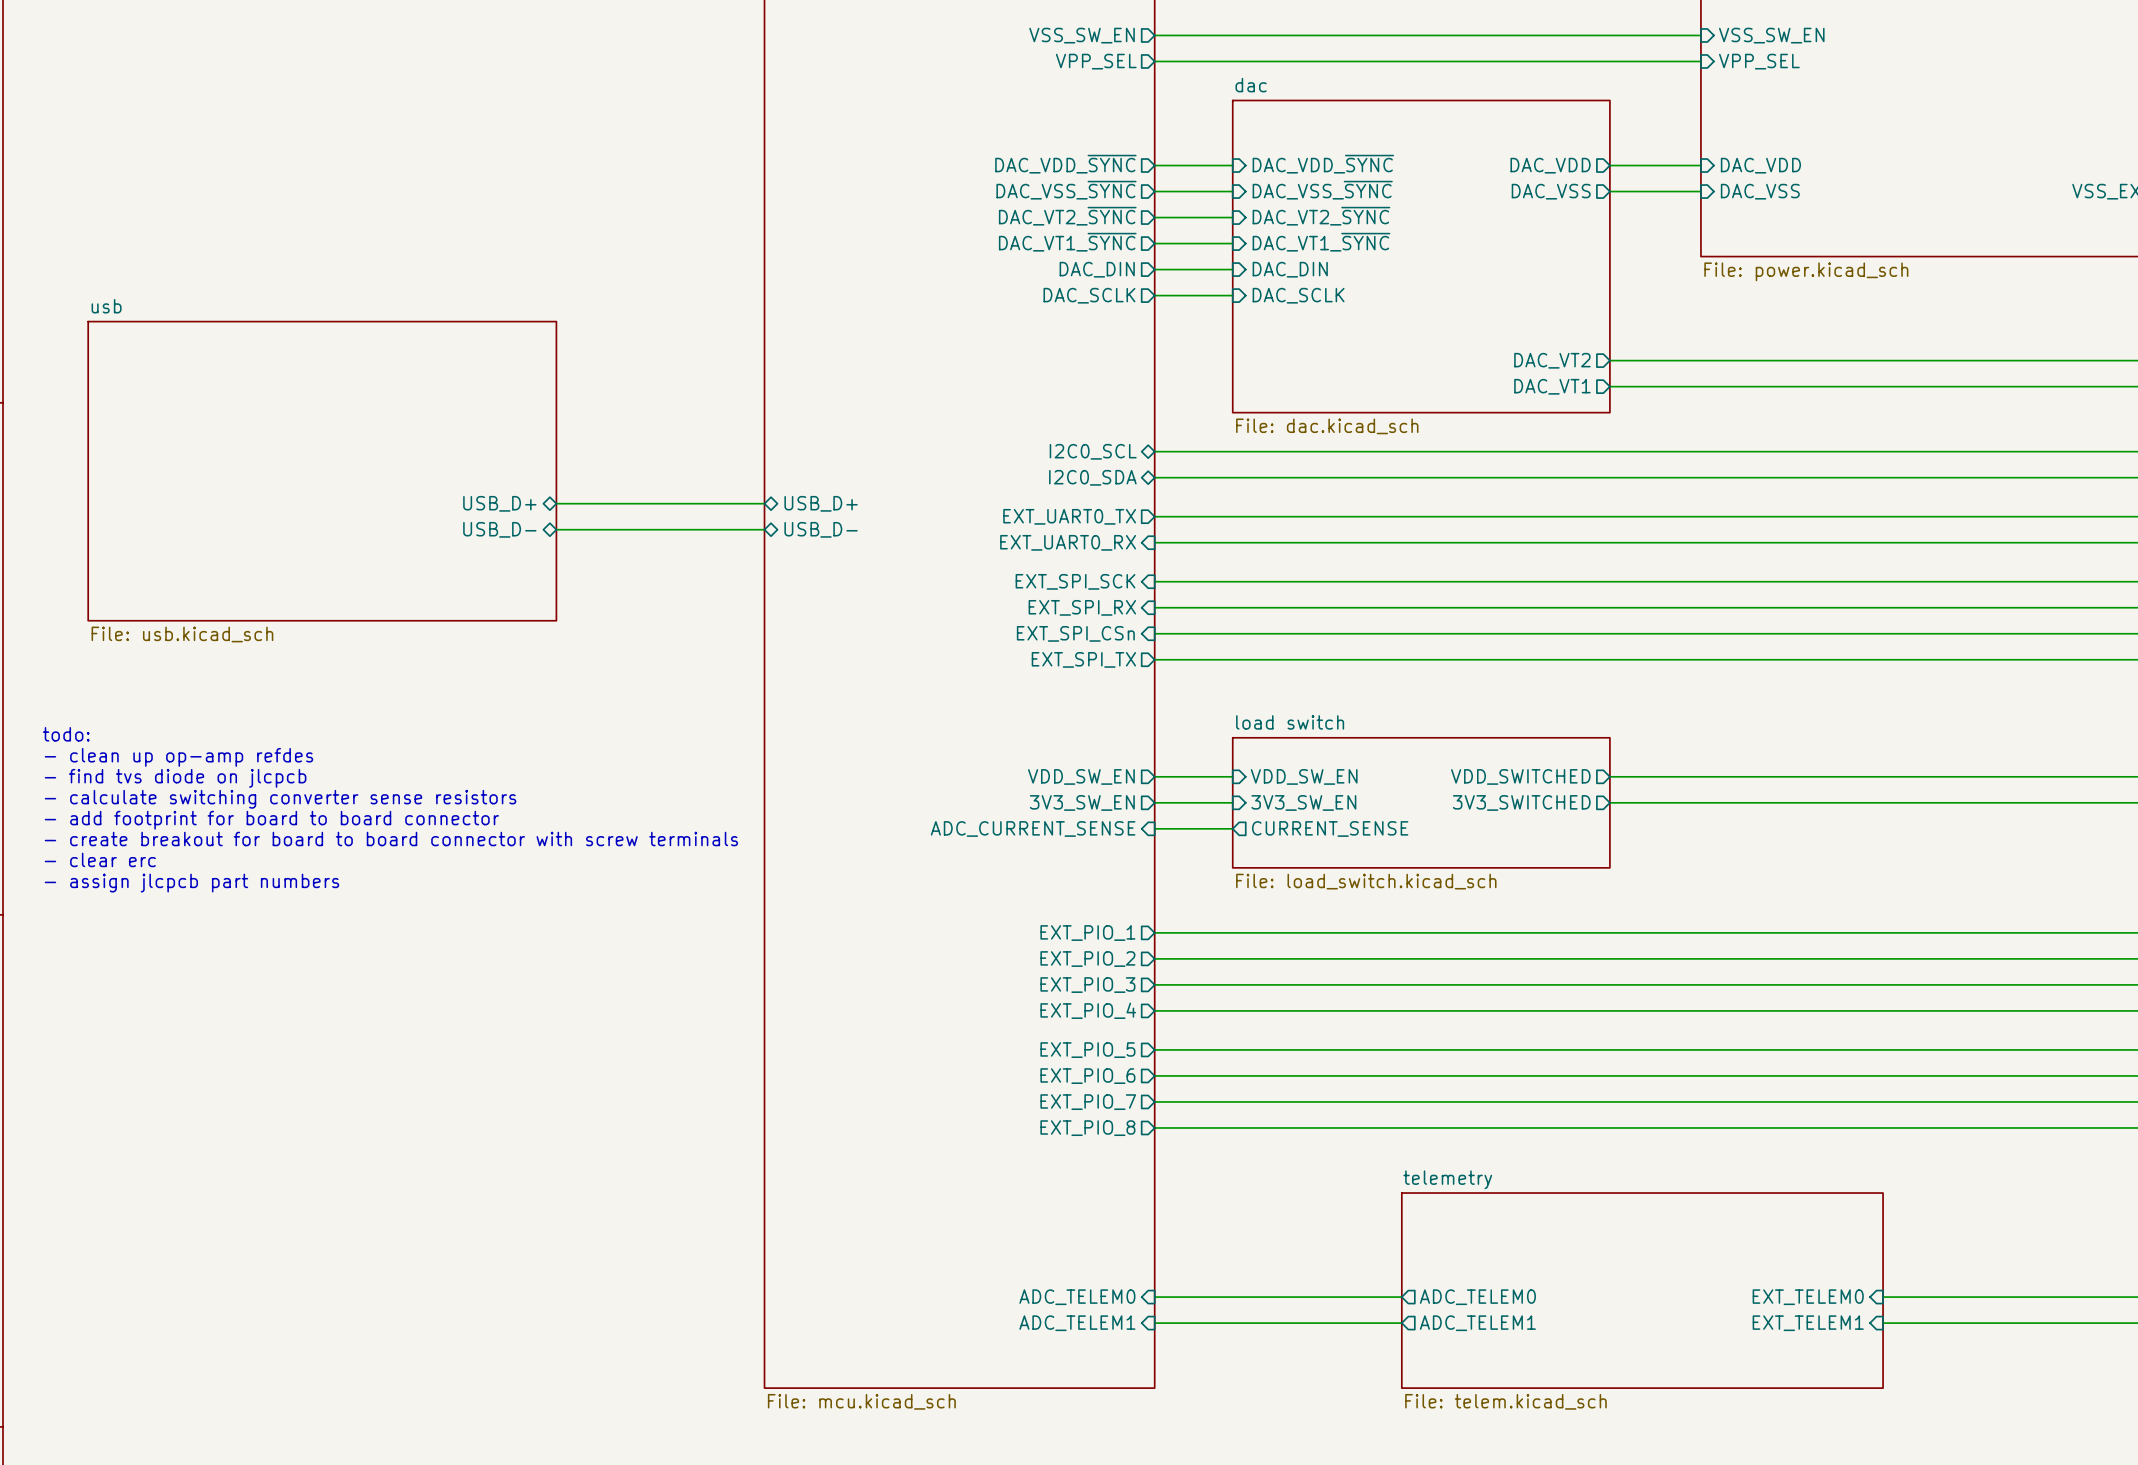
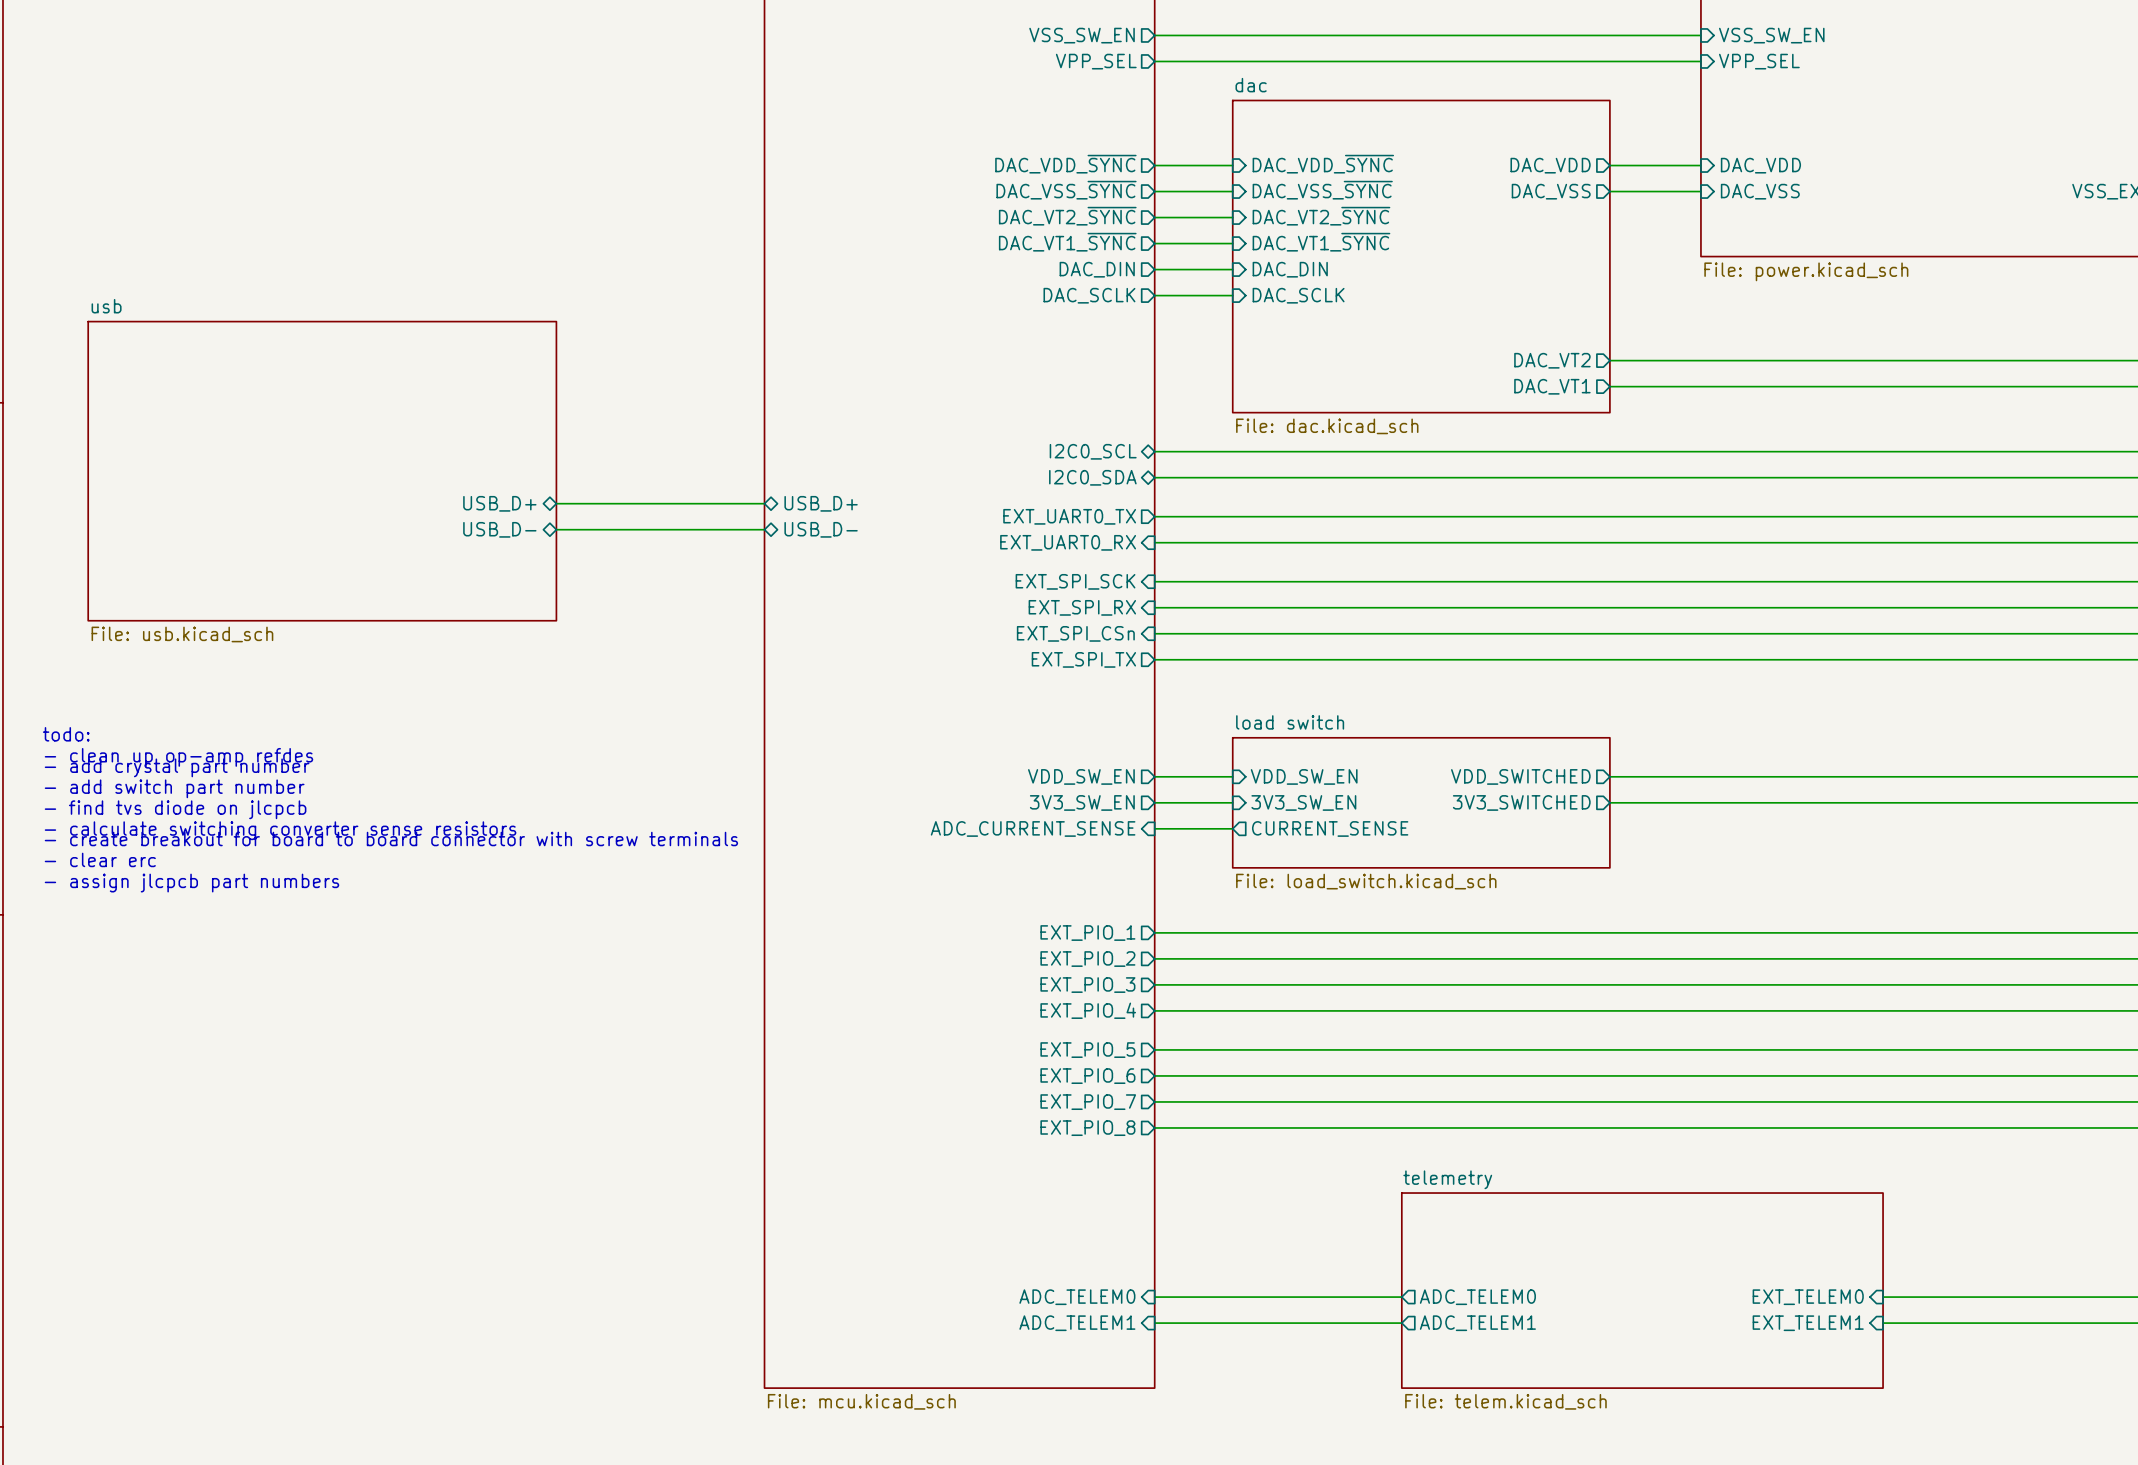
text: none -> - add crystal part number (177, 767)
text position: - find tvs diode on jlcpcb (175, 778) -> - find tvs diode on jlcpcb (175, 809)
text: none -> - add switch part number (174, 788)
text position: - calculate switching converter sense resistors (280, 799) -> - calculate switching converter sense resistors (280, 830)
text: - add footprint for board to board connector (271, 820) -> none

